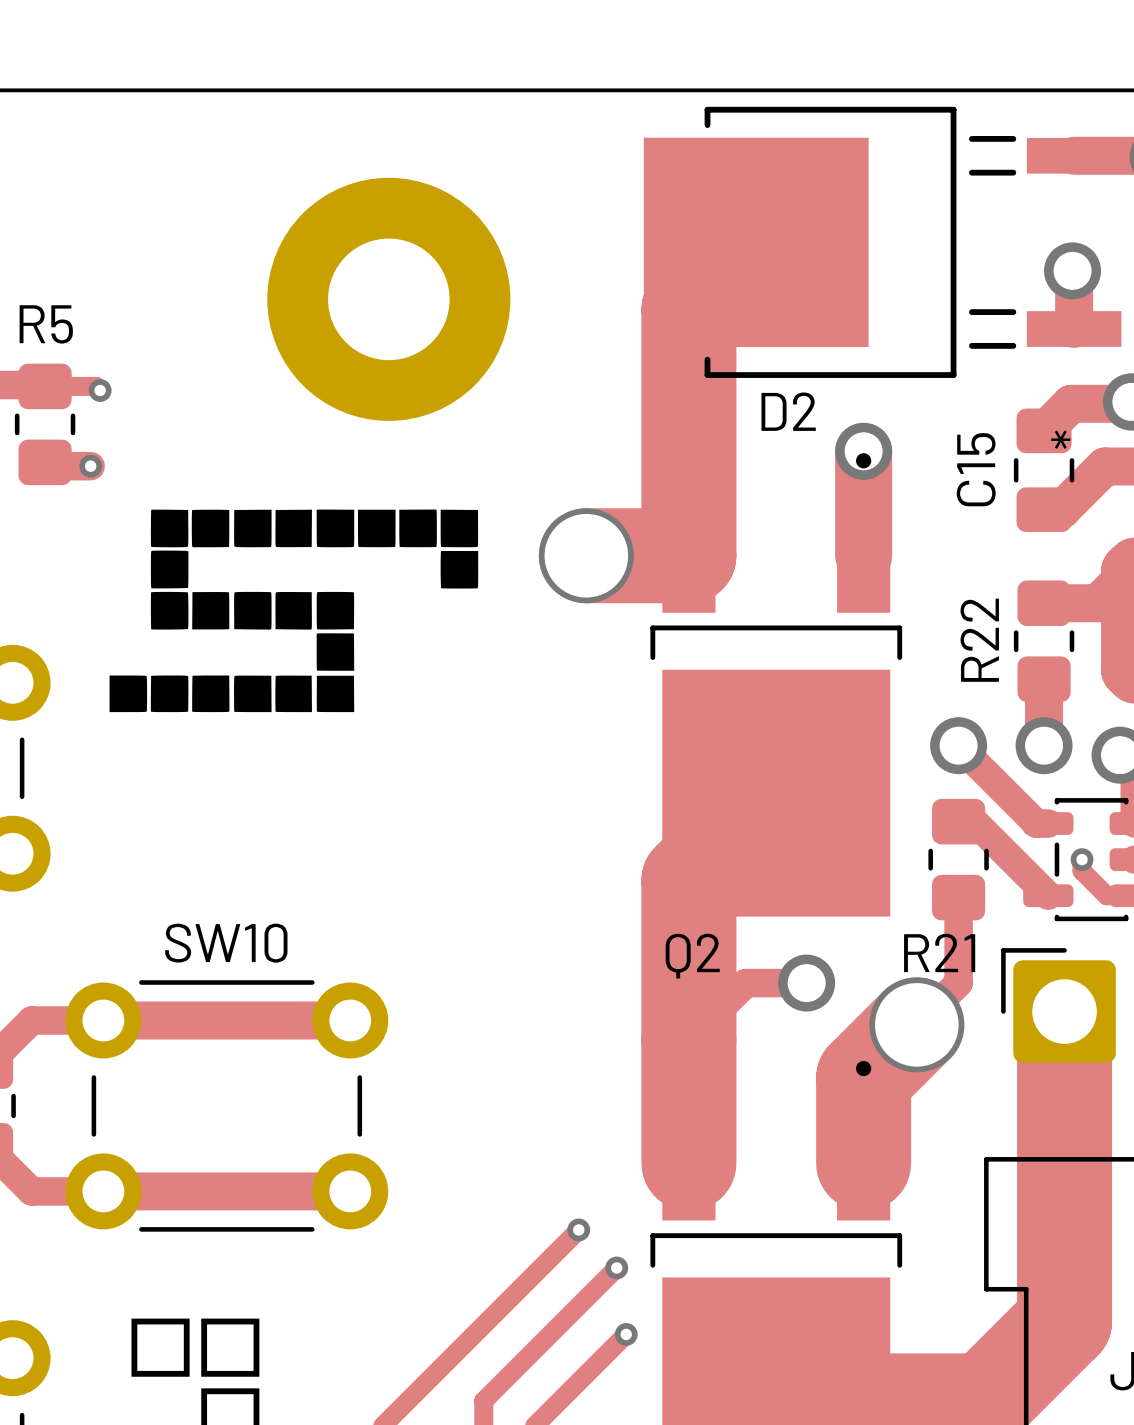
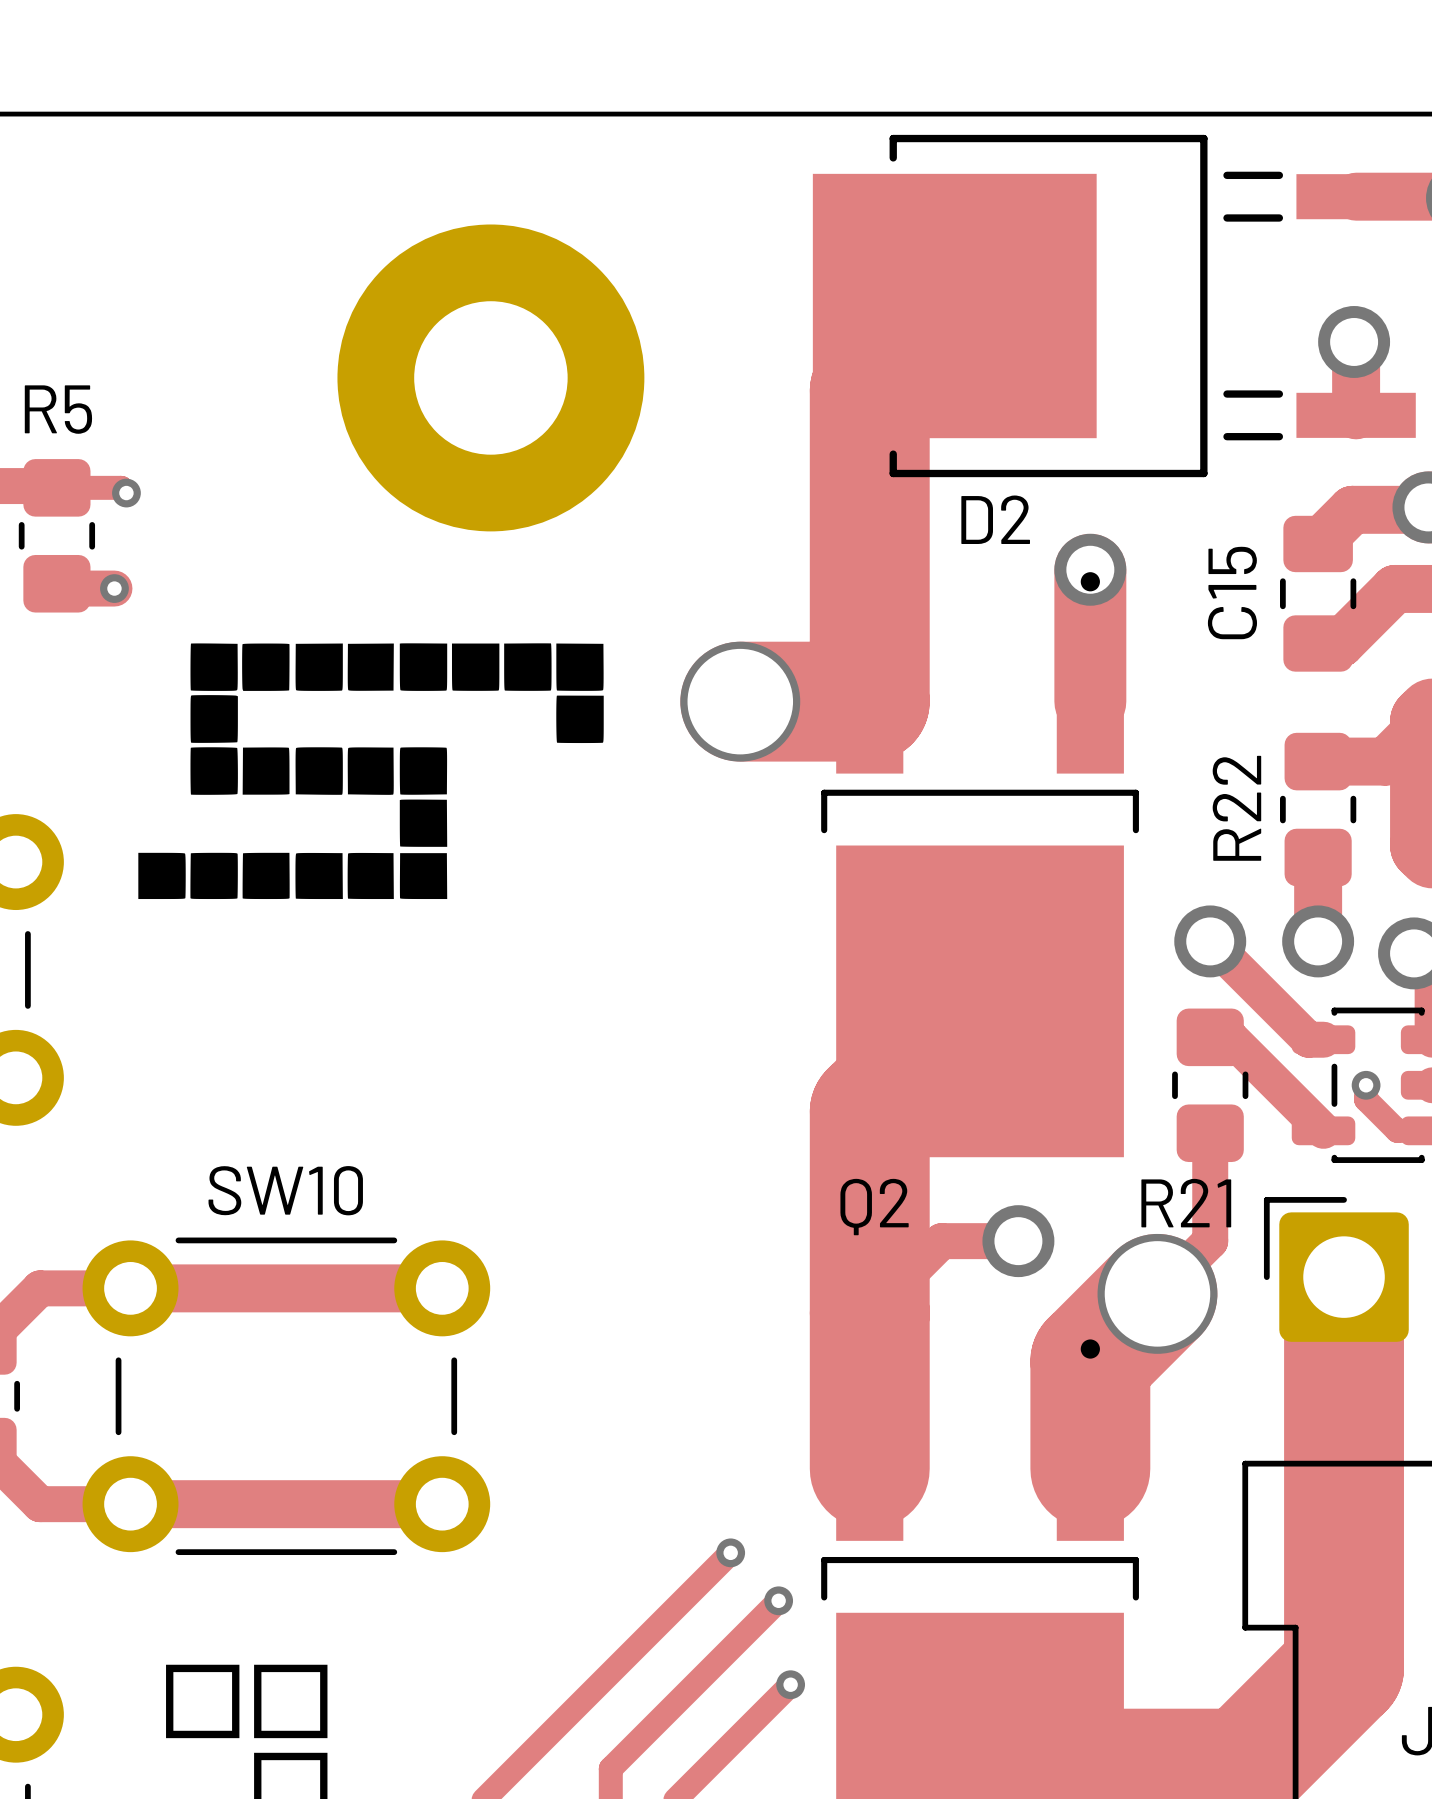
D2 text: * (1060, 439) -> none

